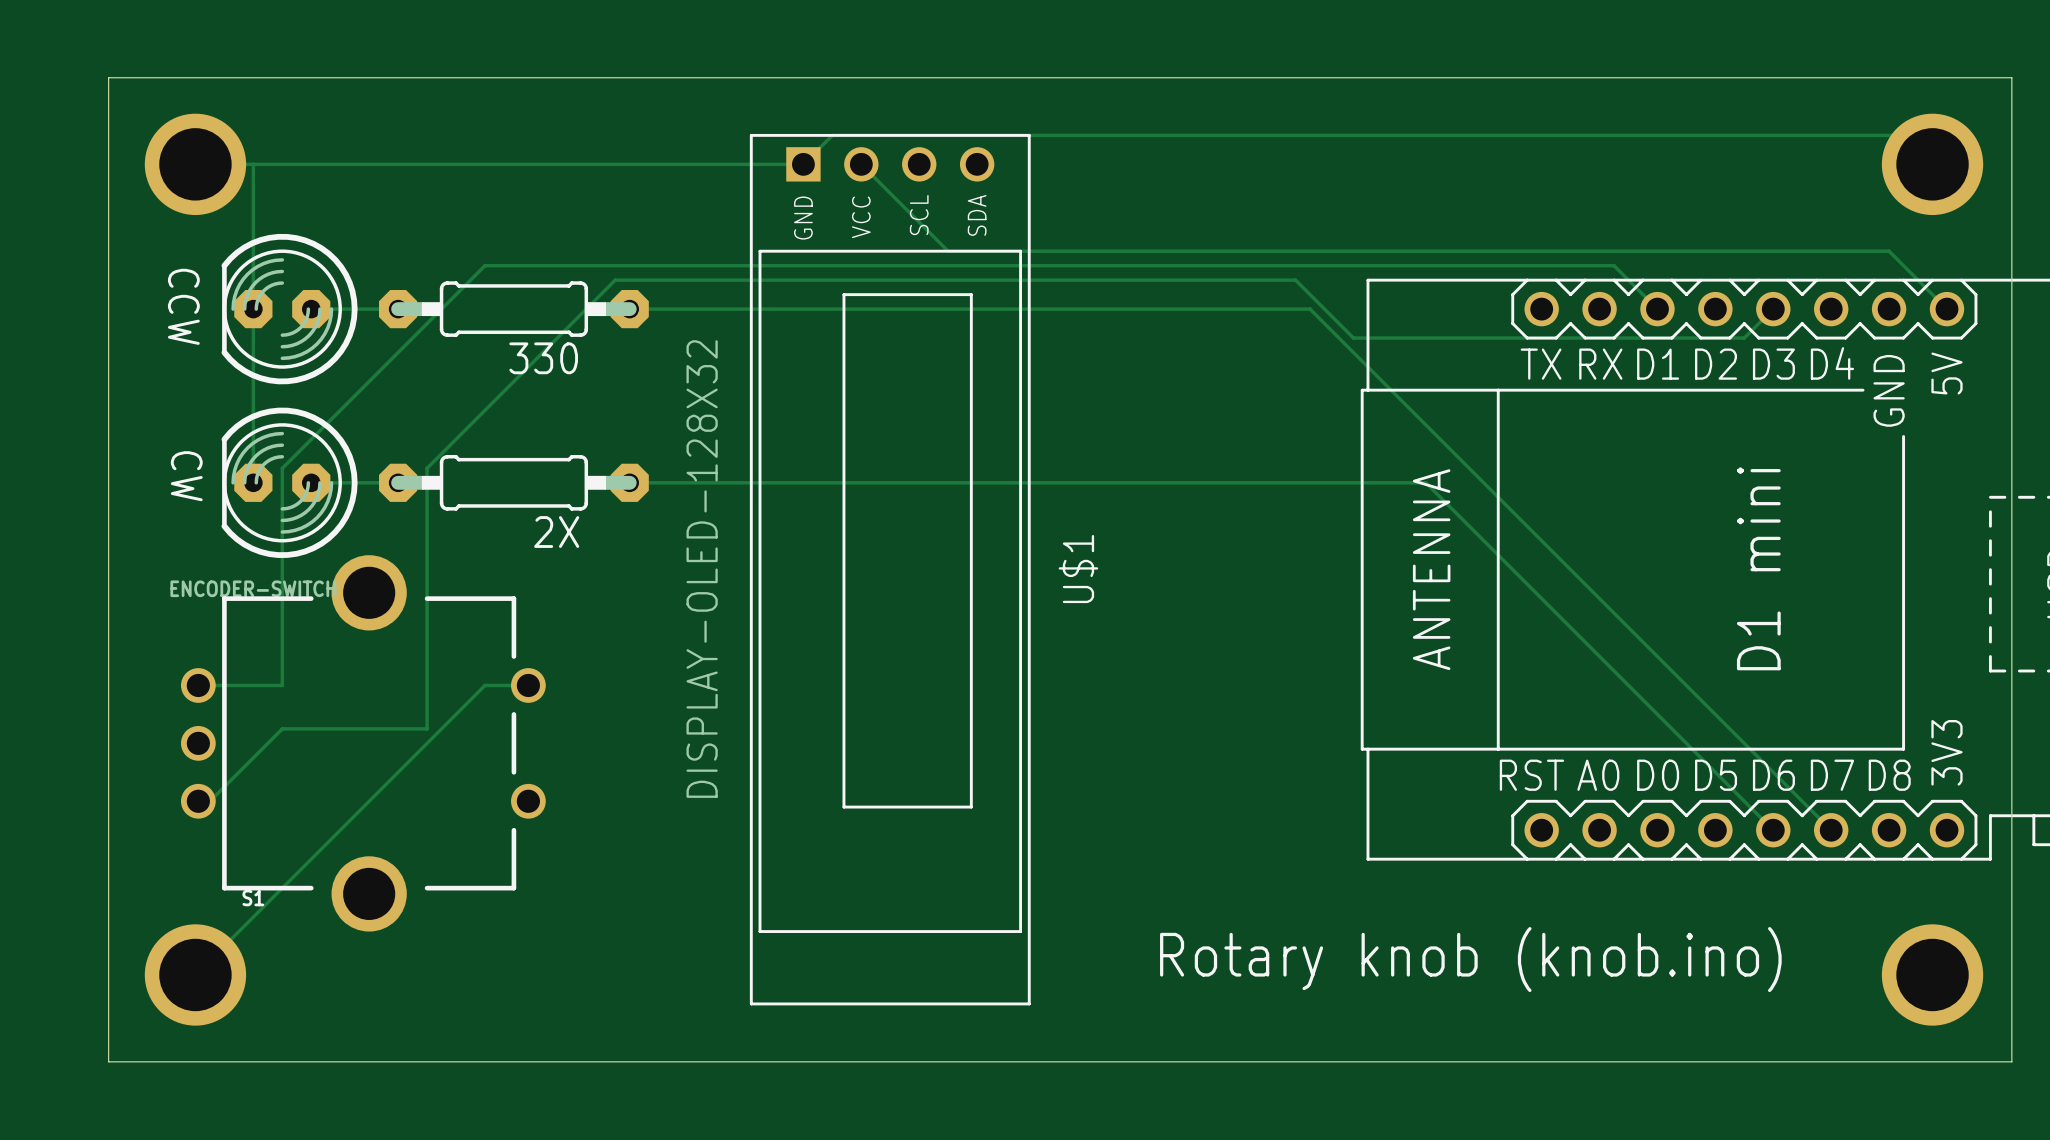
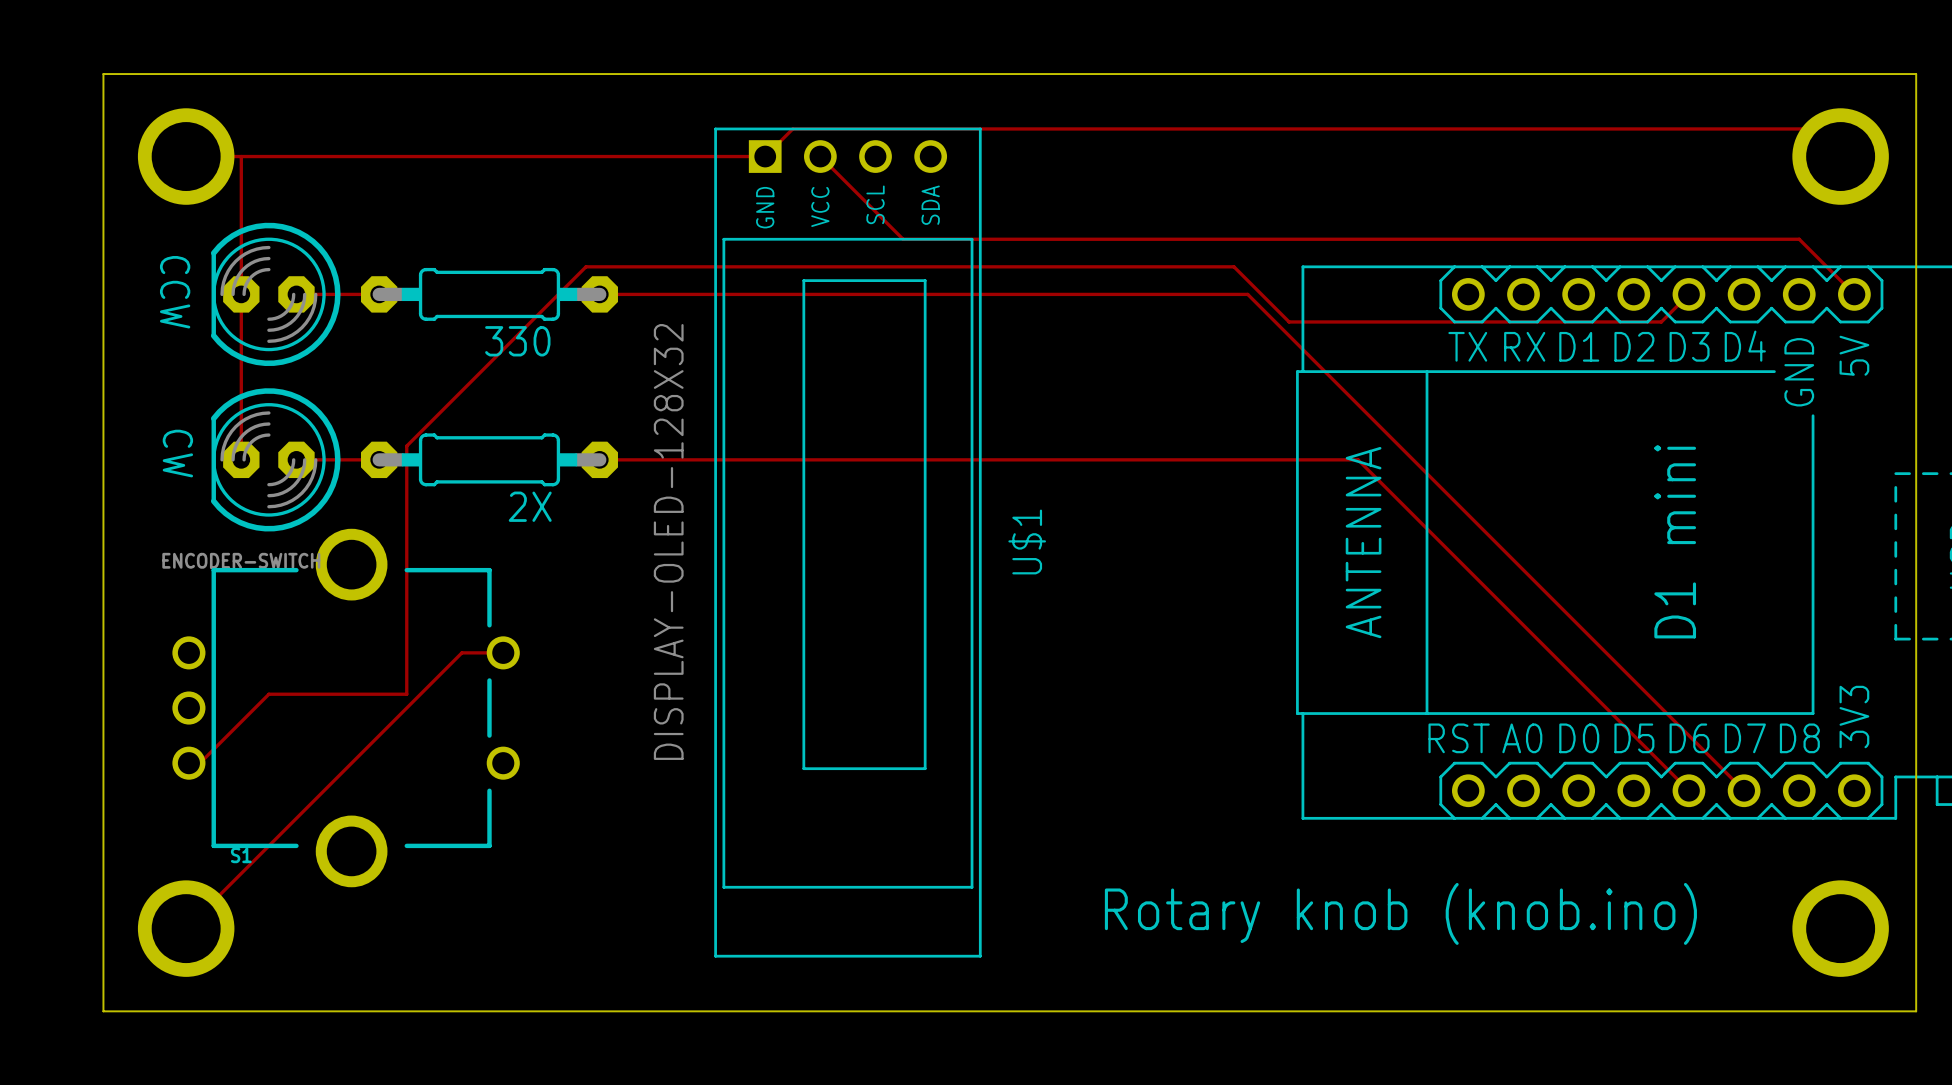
track: (1657, 309) (1614, 265) (484, 265) (282, 468) (282, 685) (198, 685) -> none

